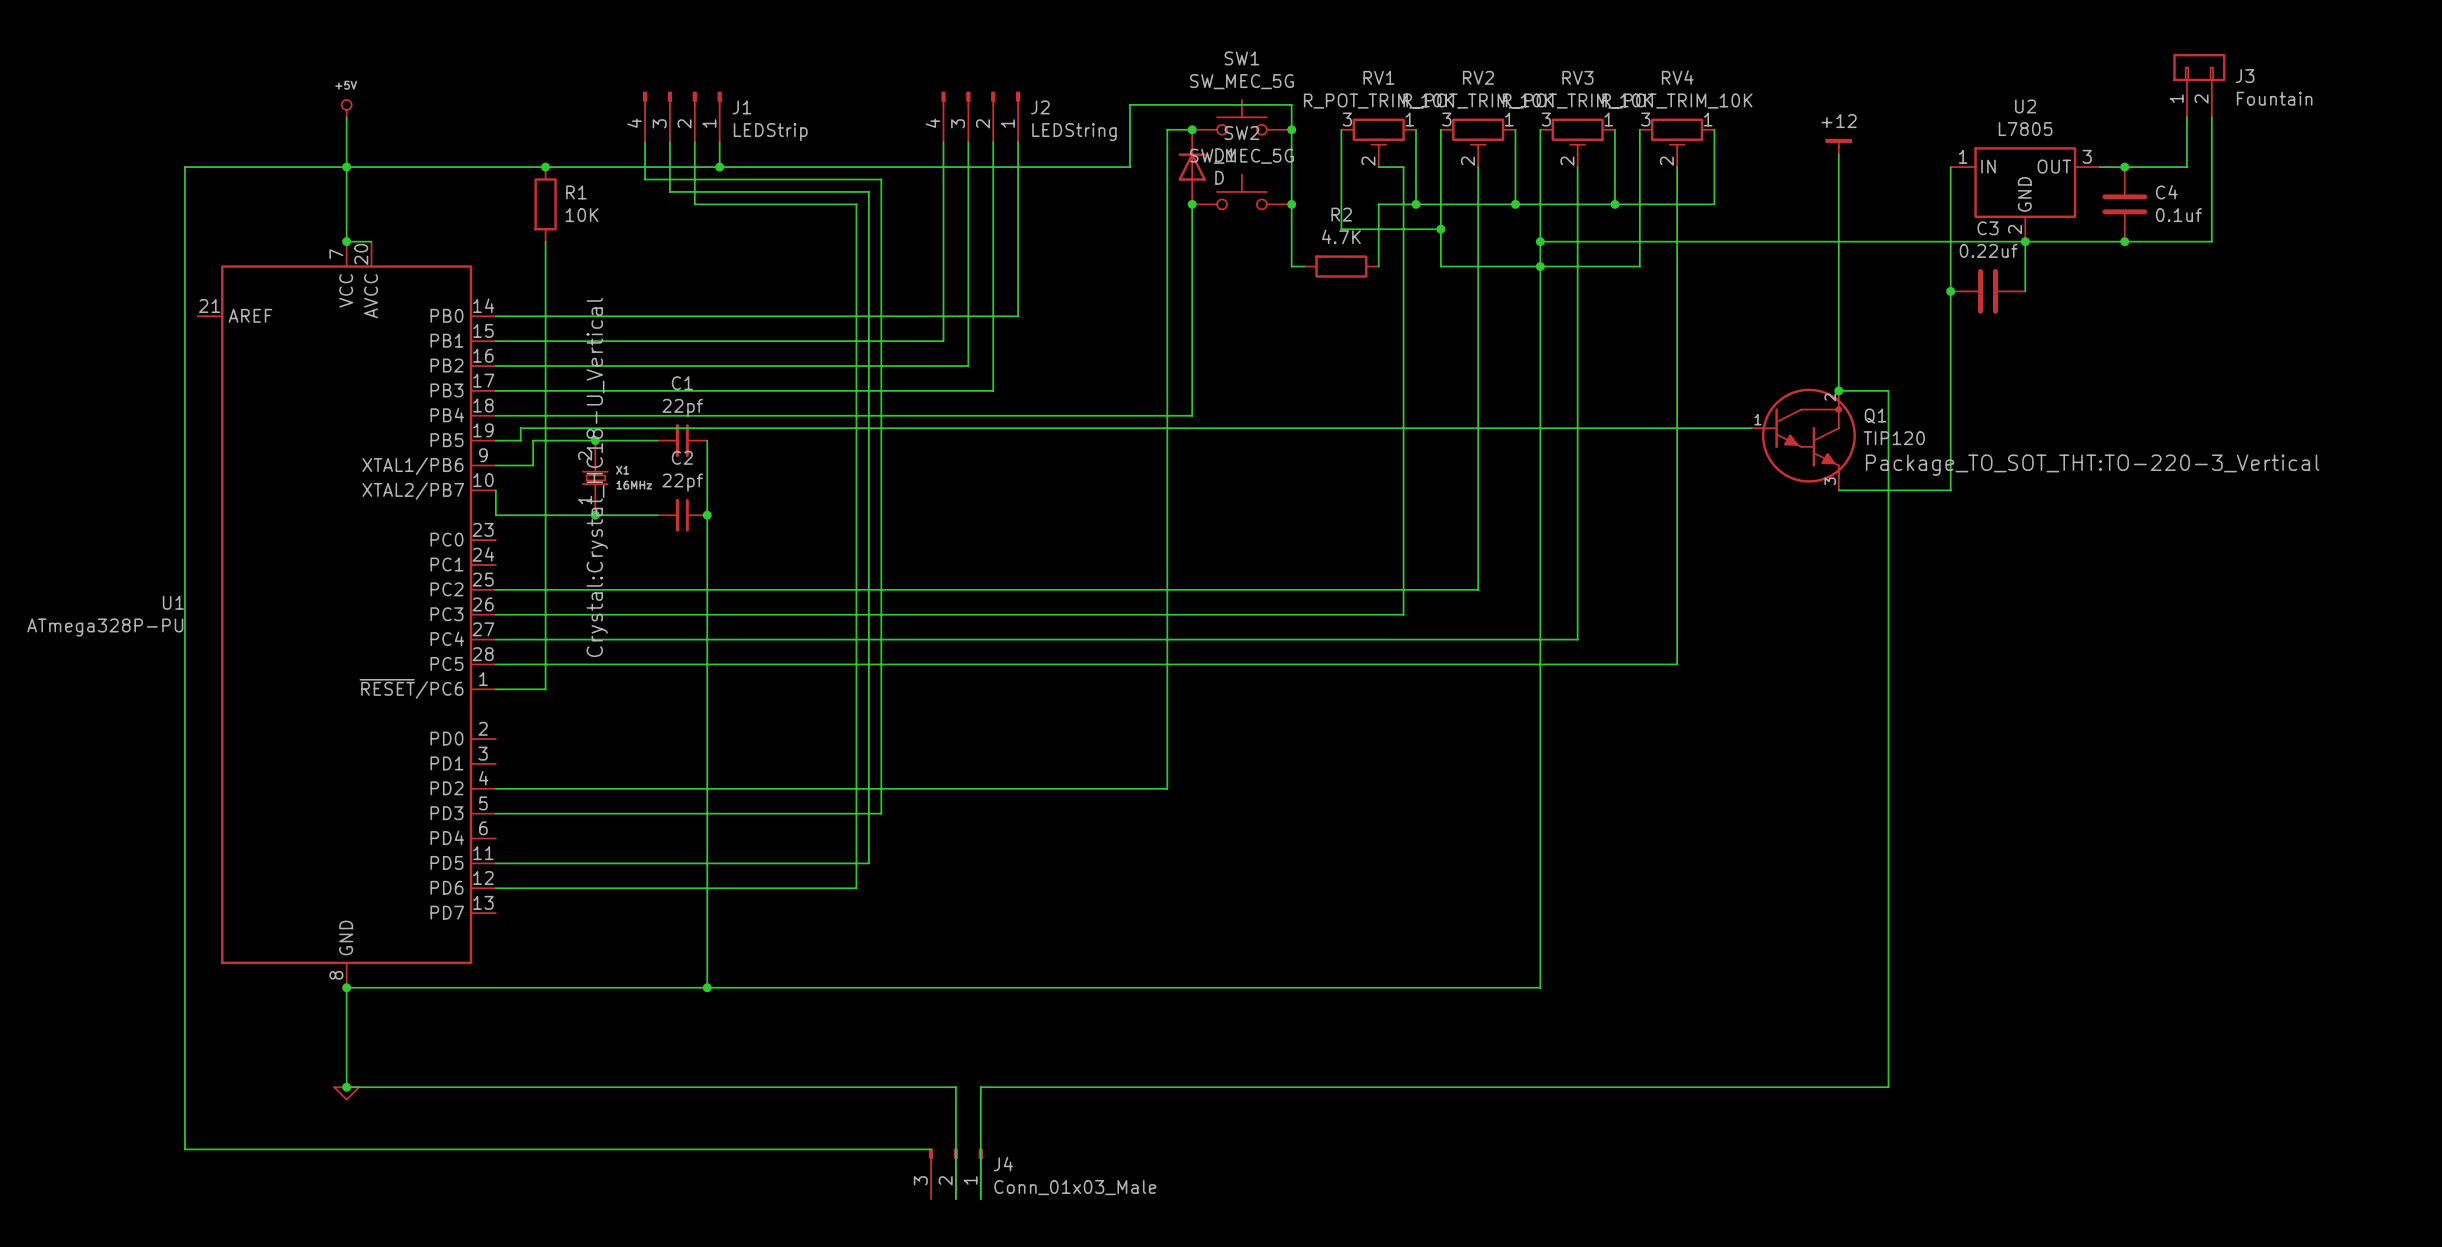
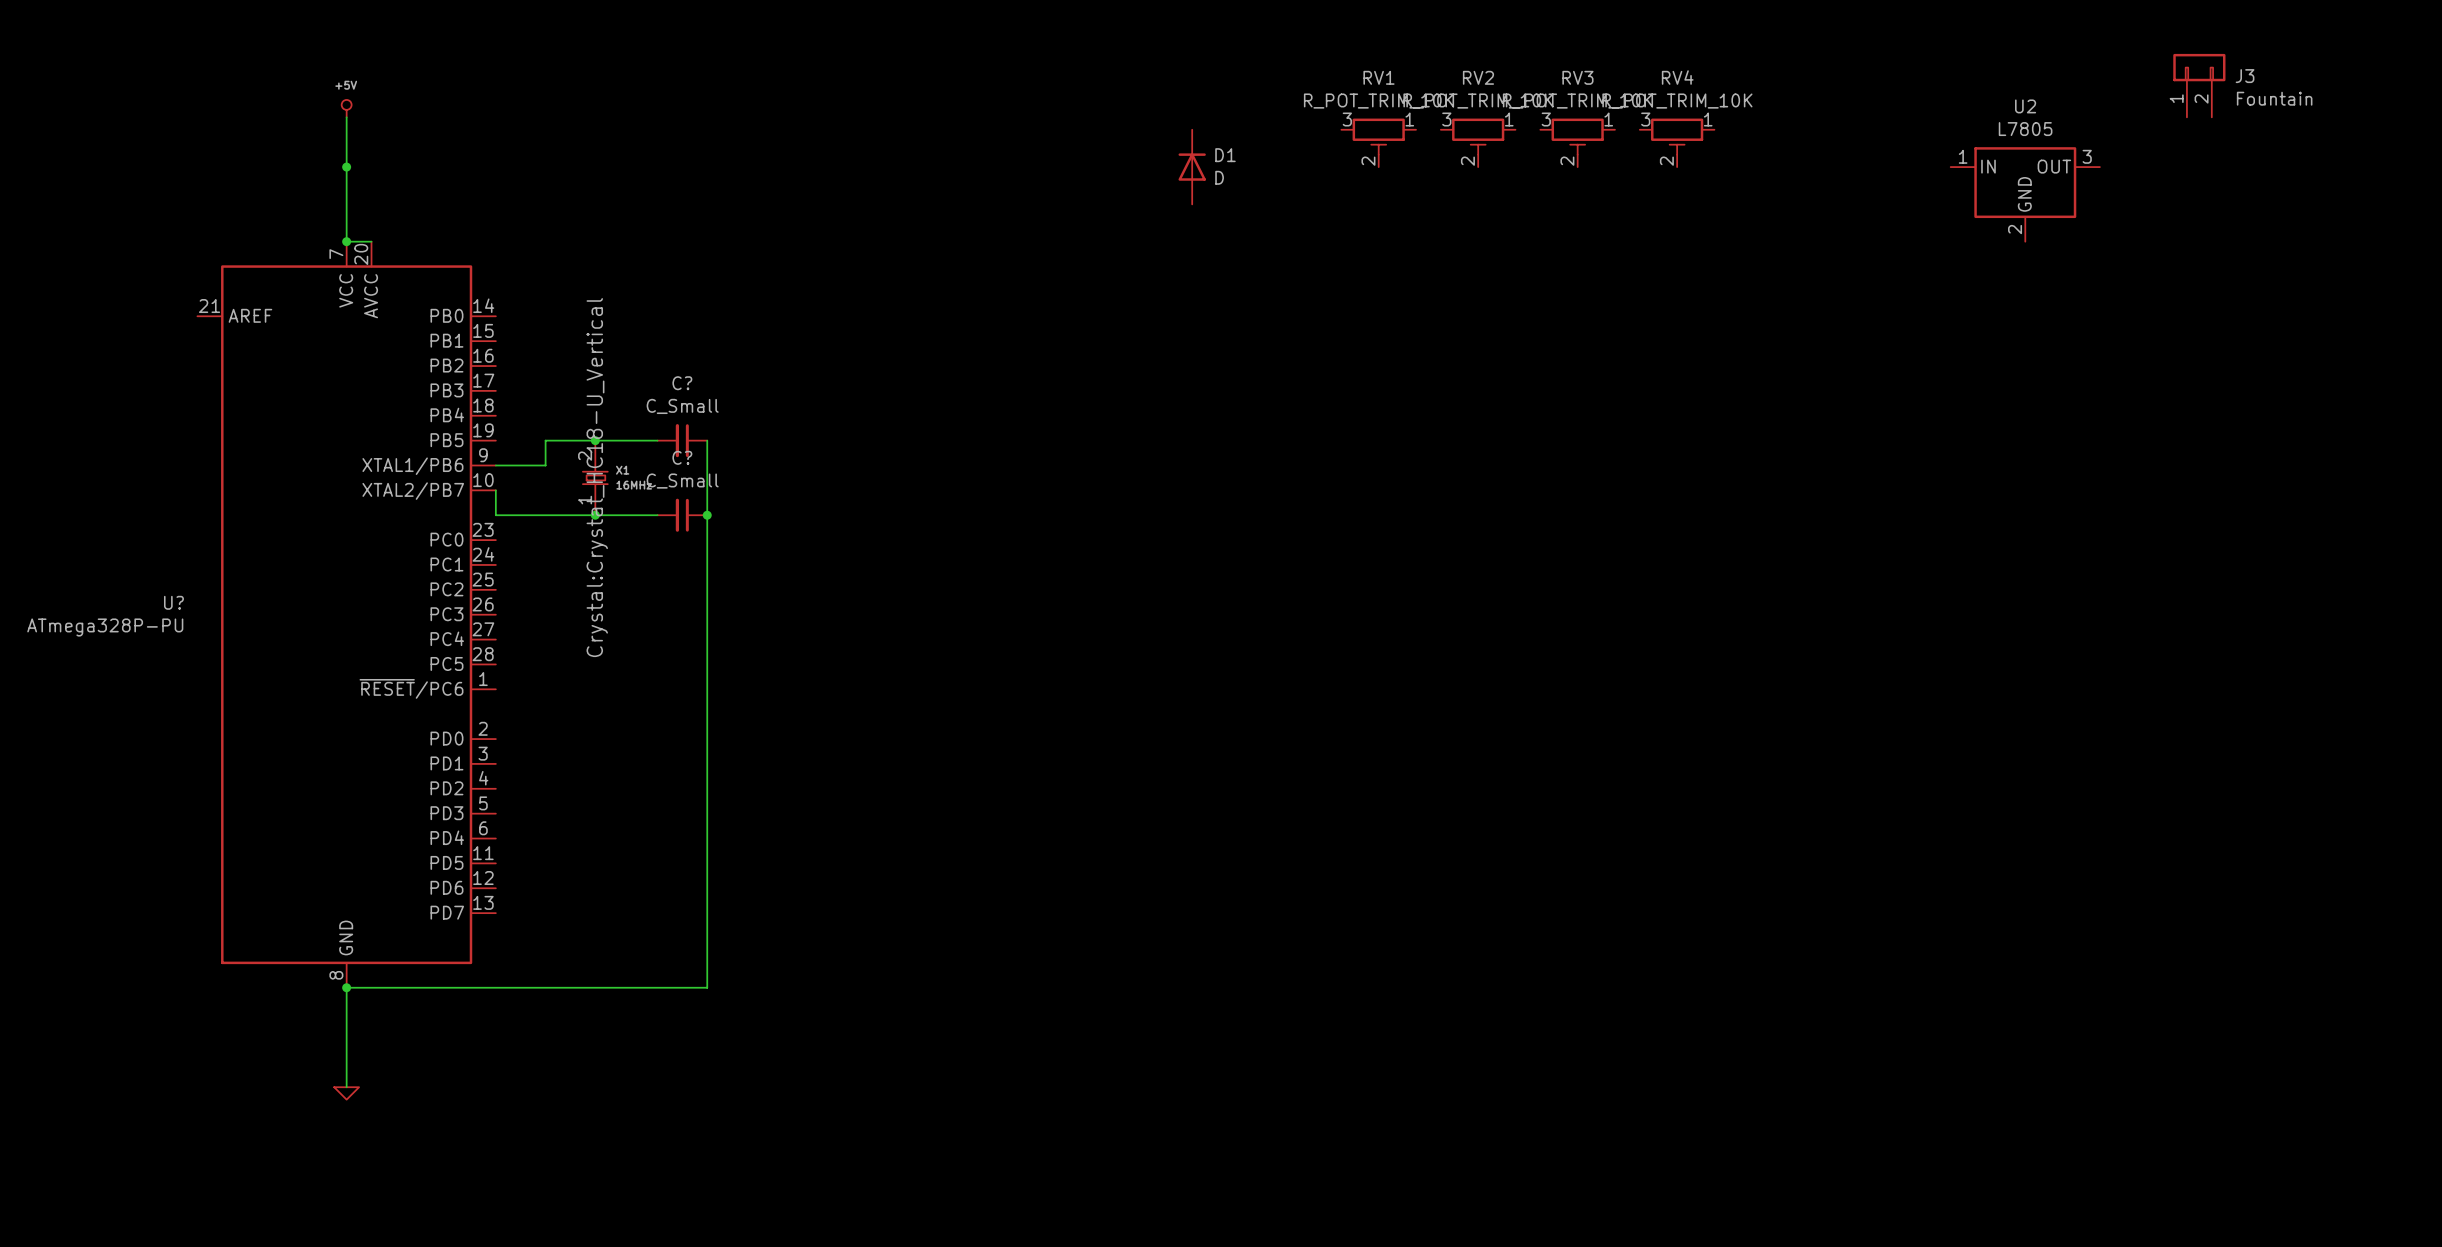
J1: LEDStrip (682, 116) -> none
J2: LEDString (980, 116) -> none
SW1: SW_MEC_5G (1241, 117) -> none
wire: (2186, 117) (2186, 167) (2099, 167) -> none
wire: (2211, 117) (2211, 241) (1540, 241) -> none
wire: (1192, 129) (1167, 129) (1167, 788) (495, 788) -> none
junction: (1192, 129) -> none
junction: (1291, 129) -> none
wire: (1341, 129) (1341, 229) (1440, 229) -> none
wire: (1416, 129) (1416, 204) -> none
wire: (1440, 129) (1440, 266) (1639, 266) (1639, 129) -> none
wire: (1515, 129) (1515, 204) -> none
wire: (1540, 129) (1540, 987) (707, 987) -> none
wire: (1614, 129) (1614, 204) -> none
wire: (1714, 129) (1714, 204) (1378, 204) (1378, 266) -> none
wire: (645, 142) (645, 179) (881, 179) (881, 813) (495, 813) -> none
wire: (669, 142) (669, 191) (868, 191) (868, 863) (495, 863) -> none
wire: (694, 142) (694, 204) (856, 204) (856, 888) (495, 888) -> none
wire: (719, 142) (719, 167) -> none
wire: (943, 142) (943, 341) (495, 341) -> none
wire: (968, 142) (968, 366) (495, 366) -> none
wire: (993, 142) (993, 390) (495, 390) -> none
wire: (1018, 142) (1018, 316) (495, 316) -> none
power symbol: +12 (1838, 147) -> none
wire: (1838, 154) (1838, 390) (1888, 390) (1888, 1087) (980, 1087) (980, 1199) -> none
junction: (545, 167) -> none
junction: (719, 167) -> none
wire: (1378, 167) (1403, 167) (1403, 614) (495, 614) -> none
wire: (1478, 167) (1478, 589) (495, 589) -> none
wire: (1577, 167) (1577, 639) (495, 639) -> none
wire: (1677, 167) (1677, 664) (495, 664) -> none
wire: (1950, 167) (1950, 490) (1838, 490) -> none
junction: (2124, 167) -> none
SW2: SW_MEC_5G (1241, 191) -> none
R1: 10K (545, 204) -> none
wire: (1192, 204) (1192, 415) (495, 415) -> none
junction: (1192, 204) -> none
junction: (1291, 204) -> none
junction: (1416, 204) -> none
junction: (1515, 204) -> none
junction: (1614, 204) -> none
C4: 0.1uf (2124, 204) -> none
junction: (1440, 229) -> none
wire: (545, 241) (545, 440) (533, 440) (533, 465) -> (545, 465) (533, 465)
junction: (1540, 241) -> none
wire: (2025, 241) (2025, 291) -> none
junction: (2025, 241) -> none
junction: (2124, 241) -> none
wire: (1304, 266) (1291, 266) (1291, 104) (1130, 104) (1130, 167) (184, 167) (184, 1149) (931, 1149) -> none
R2: 4.7K (1341, 266) -> none
junction: (1540, 266) -> none
junction: (1950, 291) -> none
C3: 0.22uf (1987, 291) -> none
C1 name: C1 (682, 383) -> C? (682, 383)
junction: (1838, 390) -> none
C1 value: 22pf (682, 407) -> C_Small (682, 406)
wire: (1751, 428) (520, 428) (520, 440) (495, 440) -> none
Q1: TIP120 (1803, 439) -> none
C2 name: C2 (682, 457) -> C? (682, 457)
wire: (545, 465) (545, 689) (495, 689) -> none
C2 value: 22pf (682, 482) -> C_Small (682, 481)
U1 name: U1 (173, 602) -> U? (173, 602)
junction: (707, 987) -> none
wire: (346, 1087) (955, 1087) (955, 1199) -> none
junction: (346, 1087) -> none
J4: Conn_01x03_Male (955, 1173) -> none

